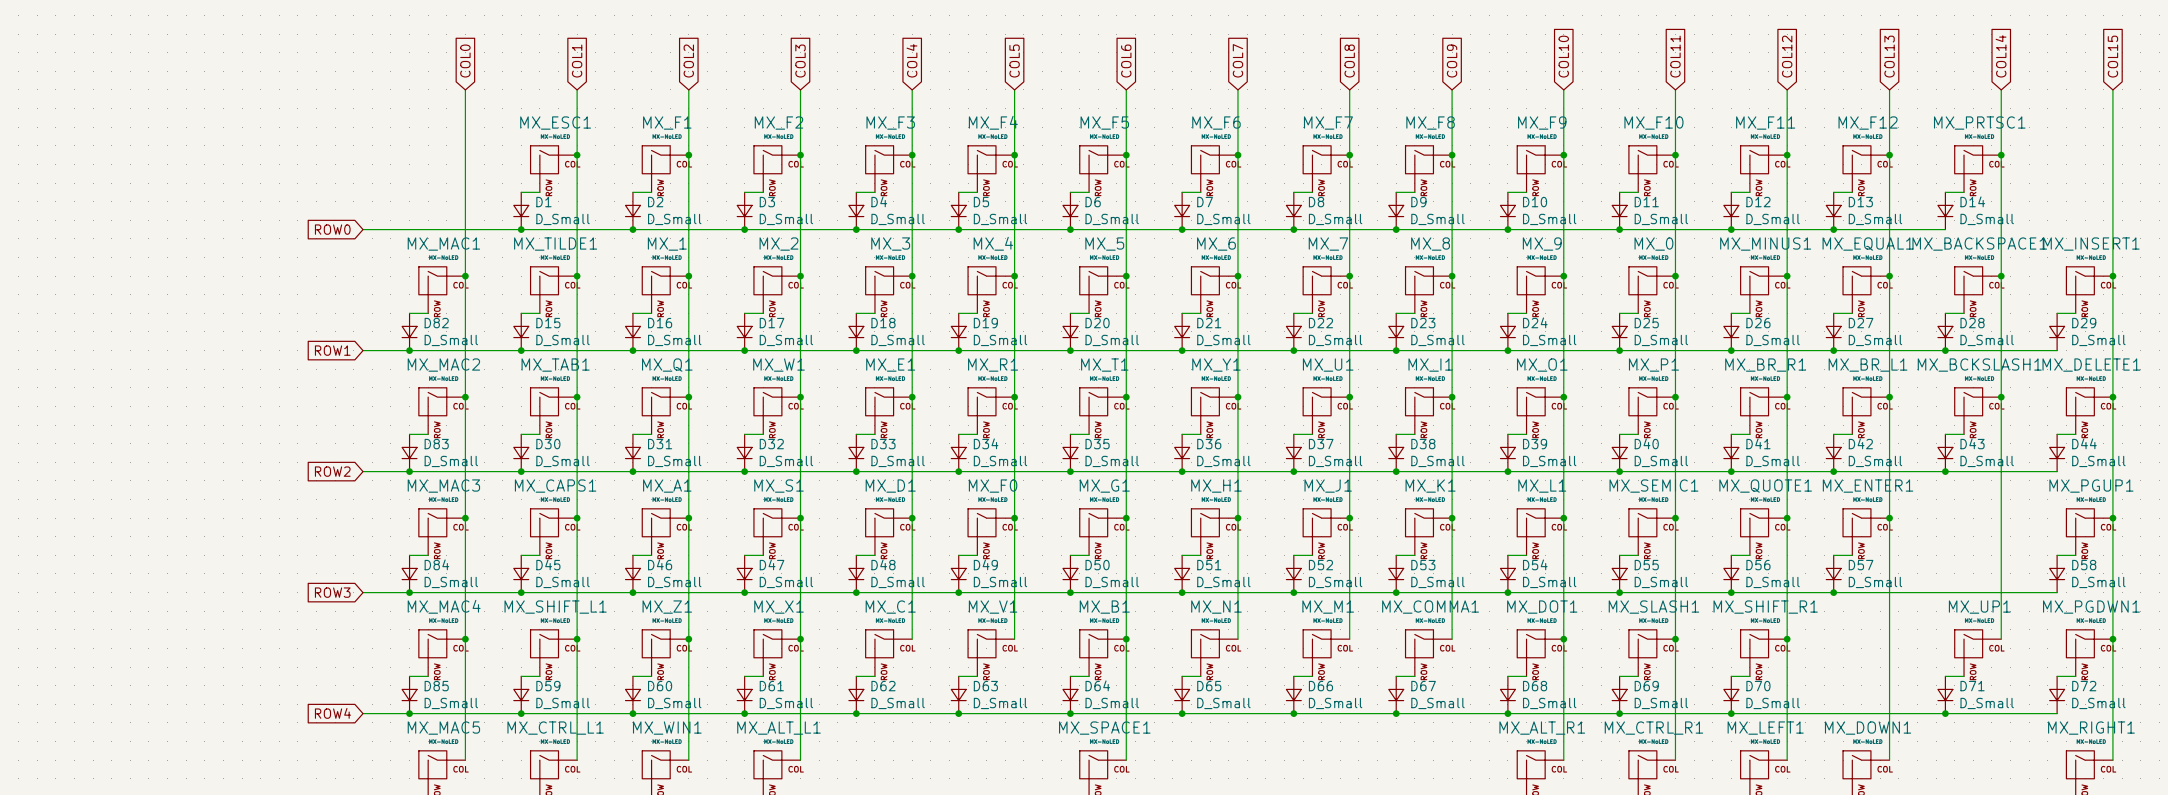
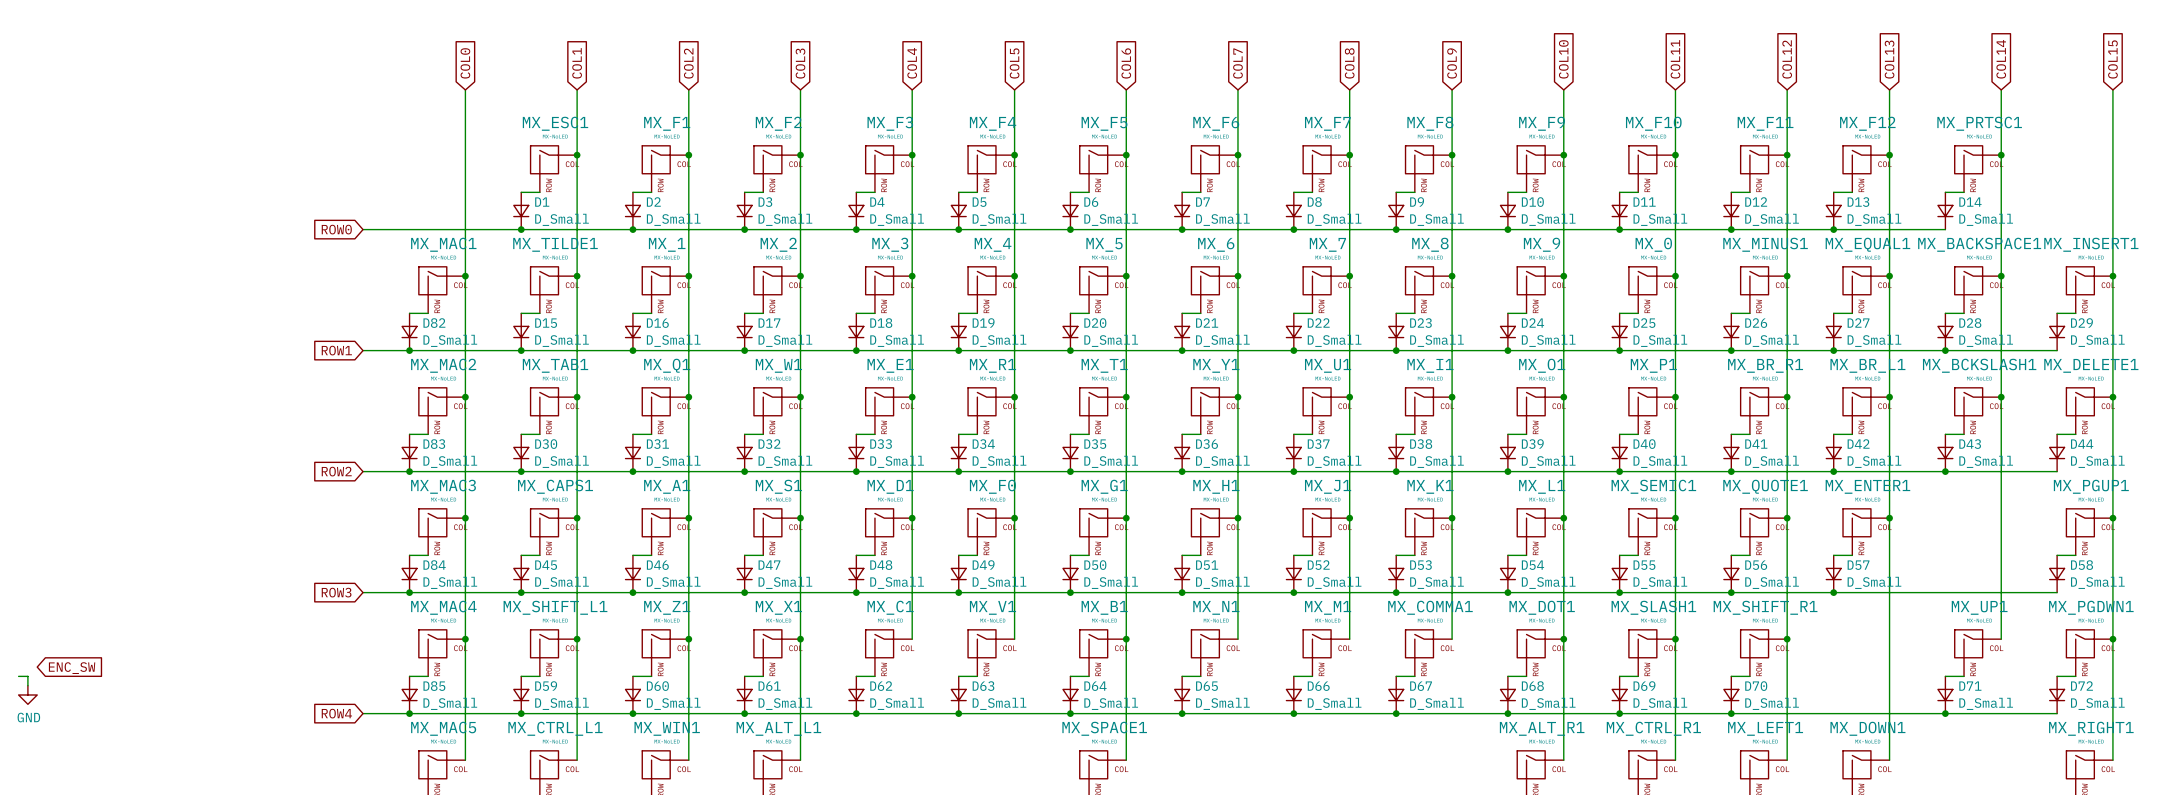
global label: none -> ENC_SW (72, 668)
wire: none -> (18, 676) (27, 676) (27, 685)
power symbol: none -> GND (27, 694)

